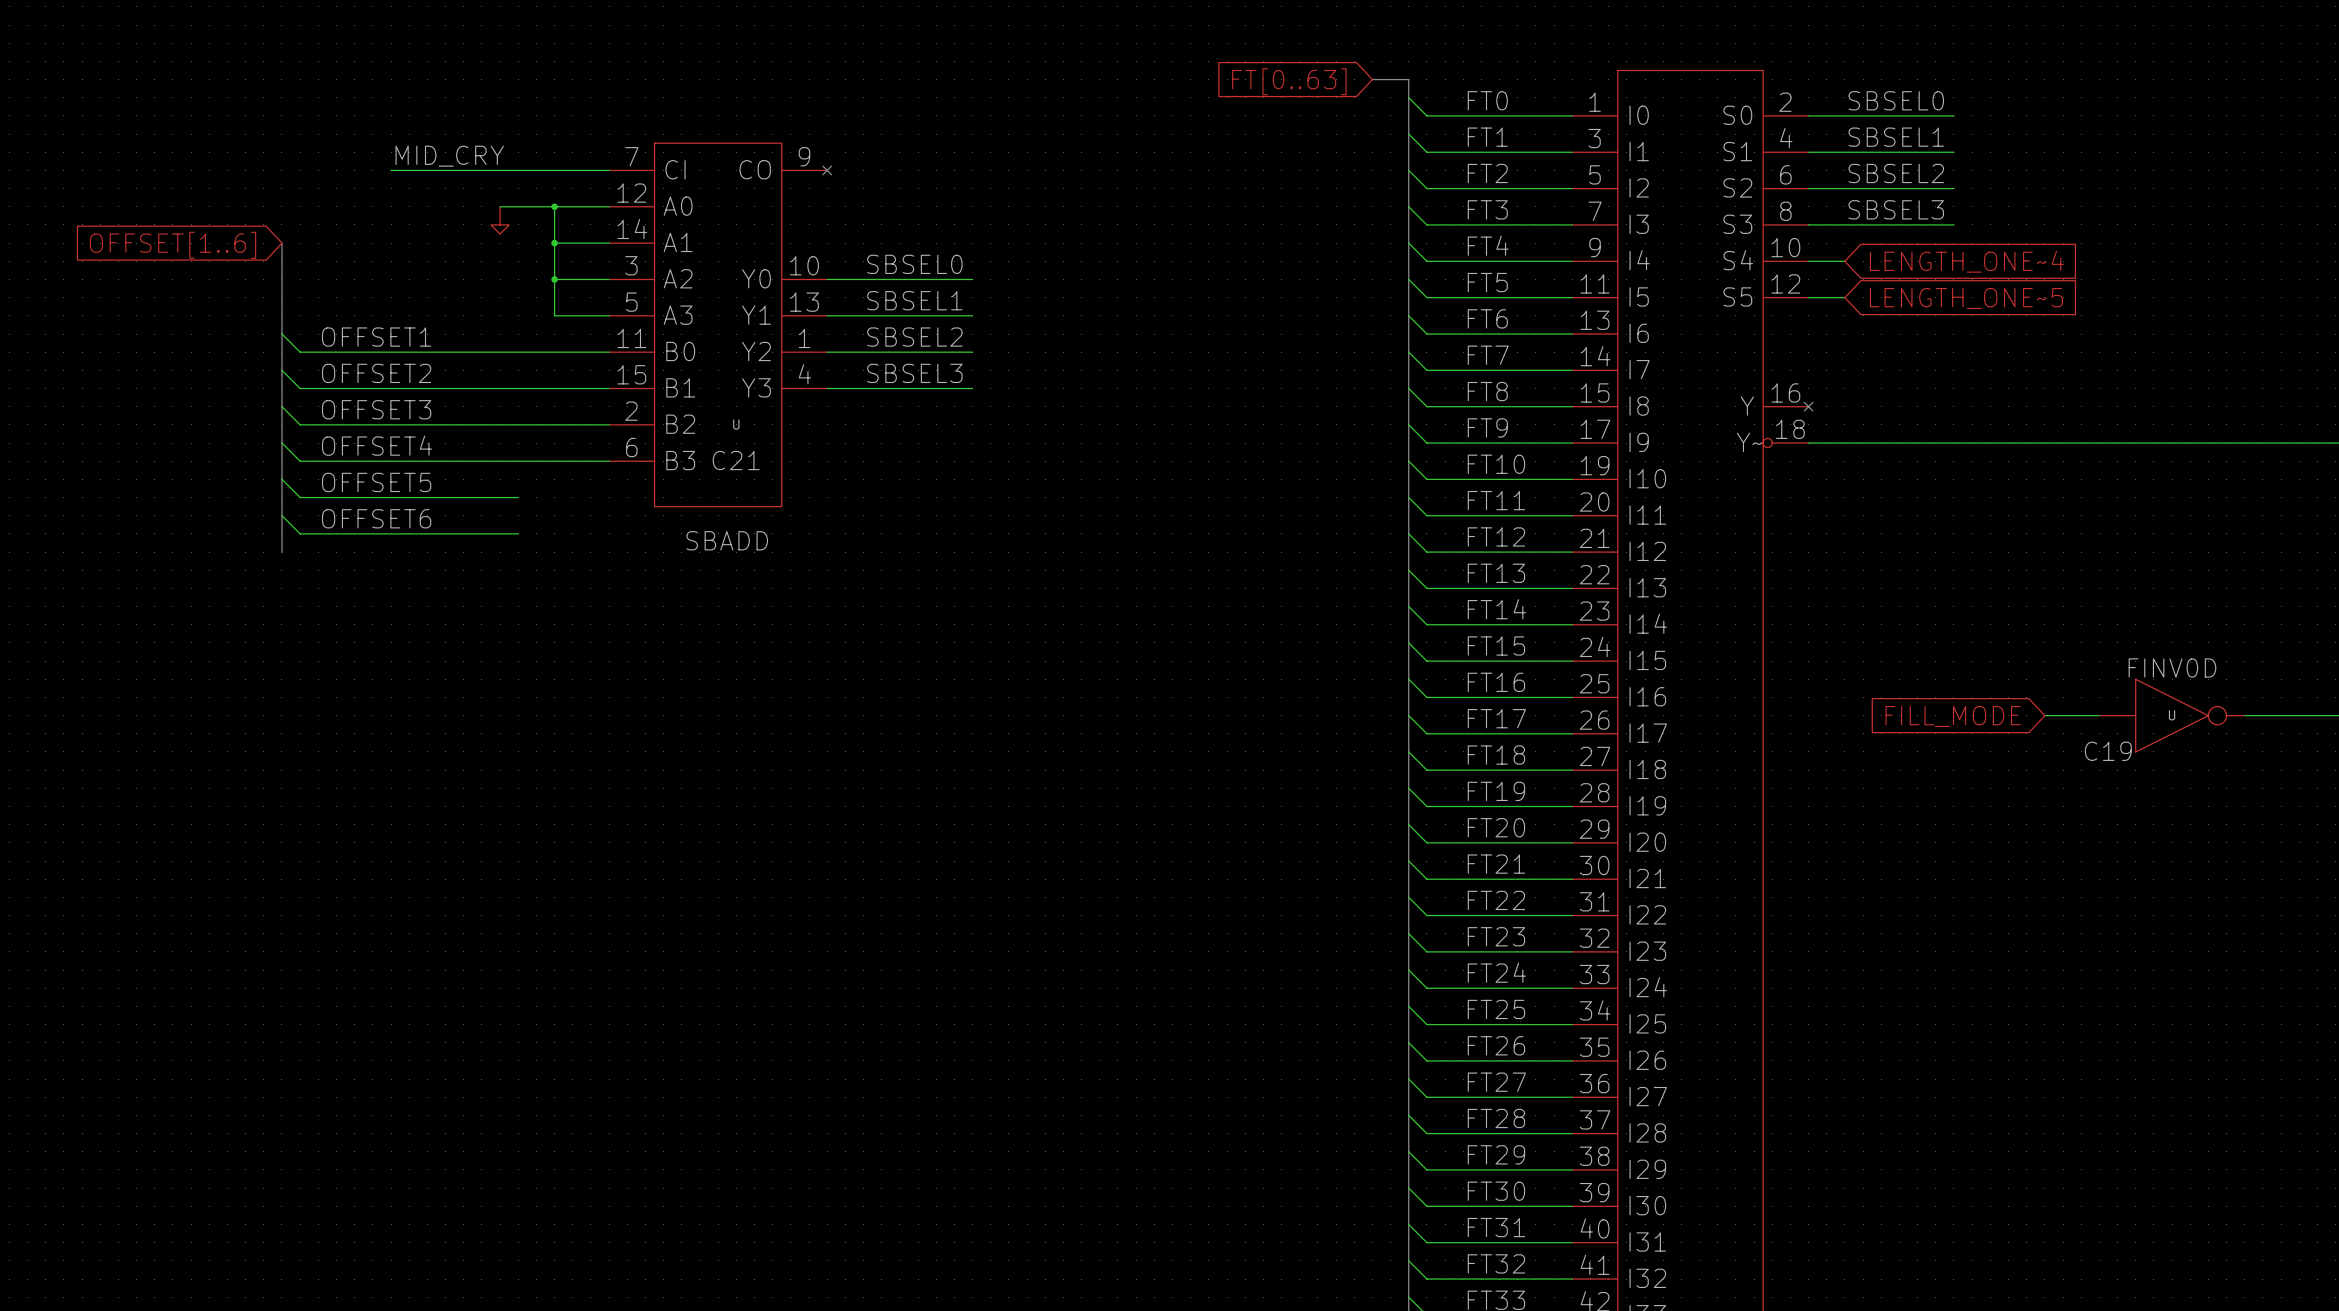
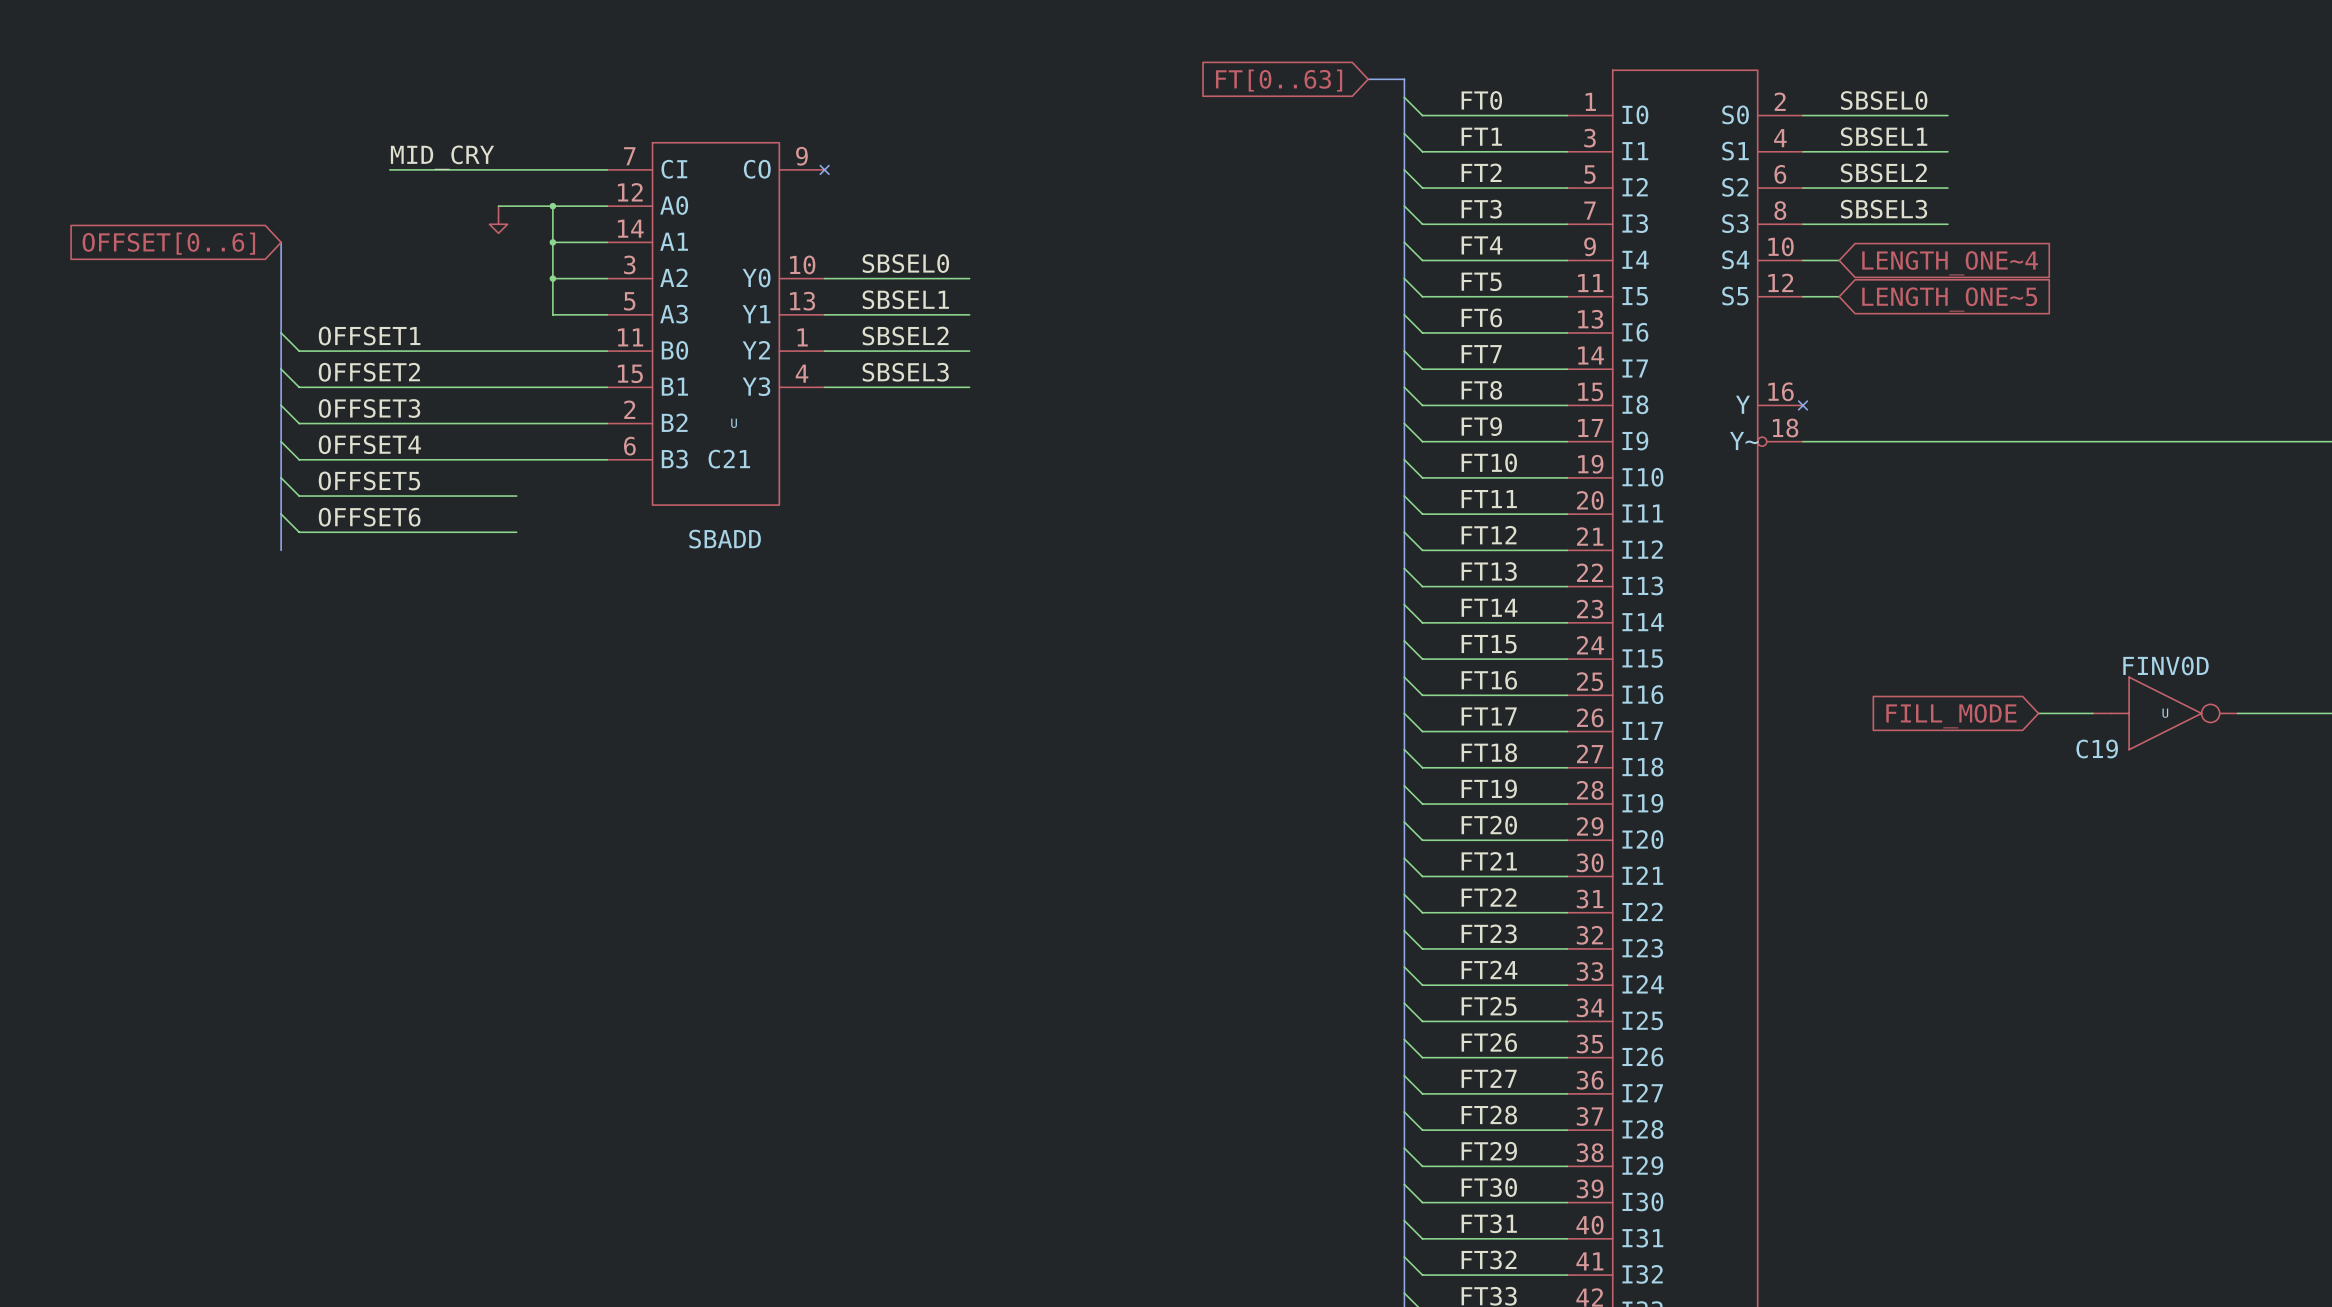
global label: OFFSET[1..6] (172, 245) -> OFFSET[0..6] (168, 243)

